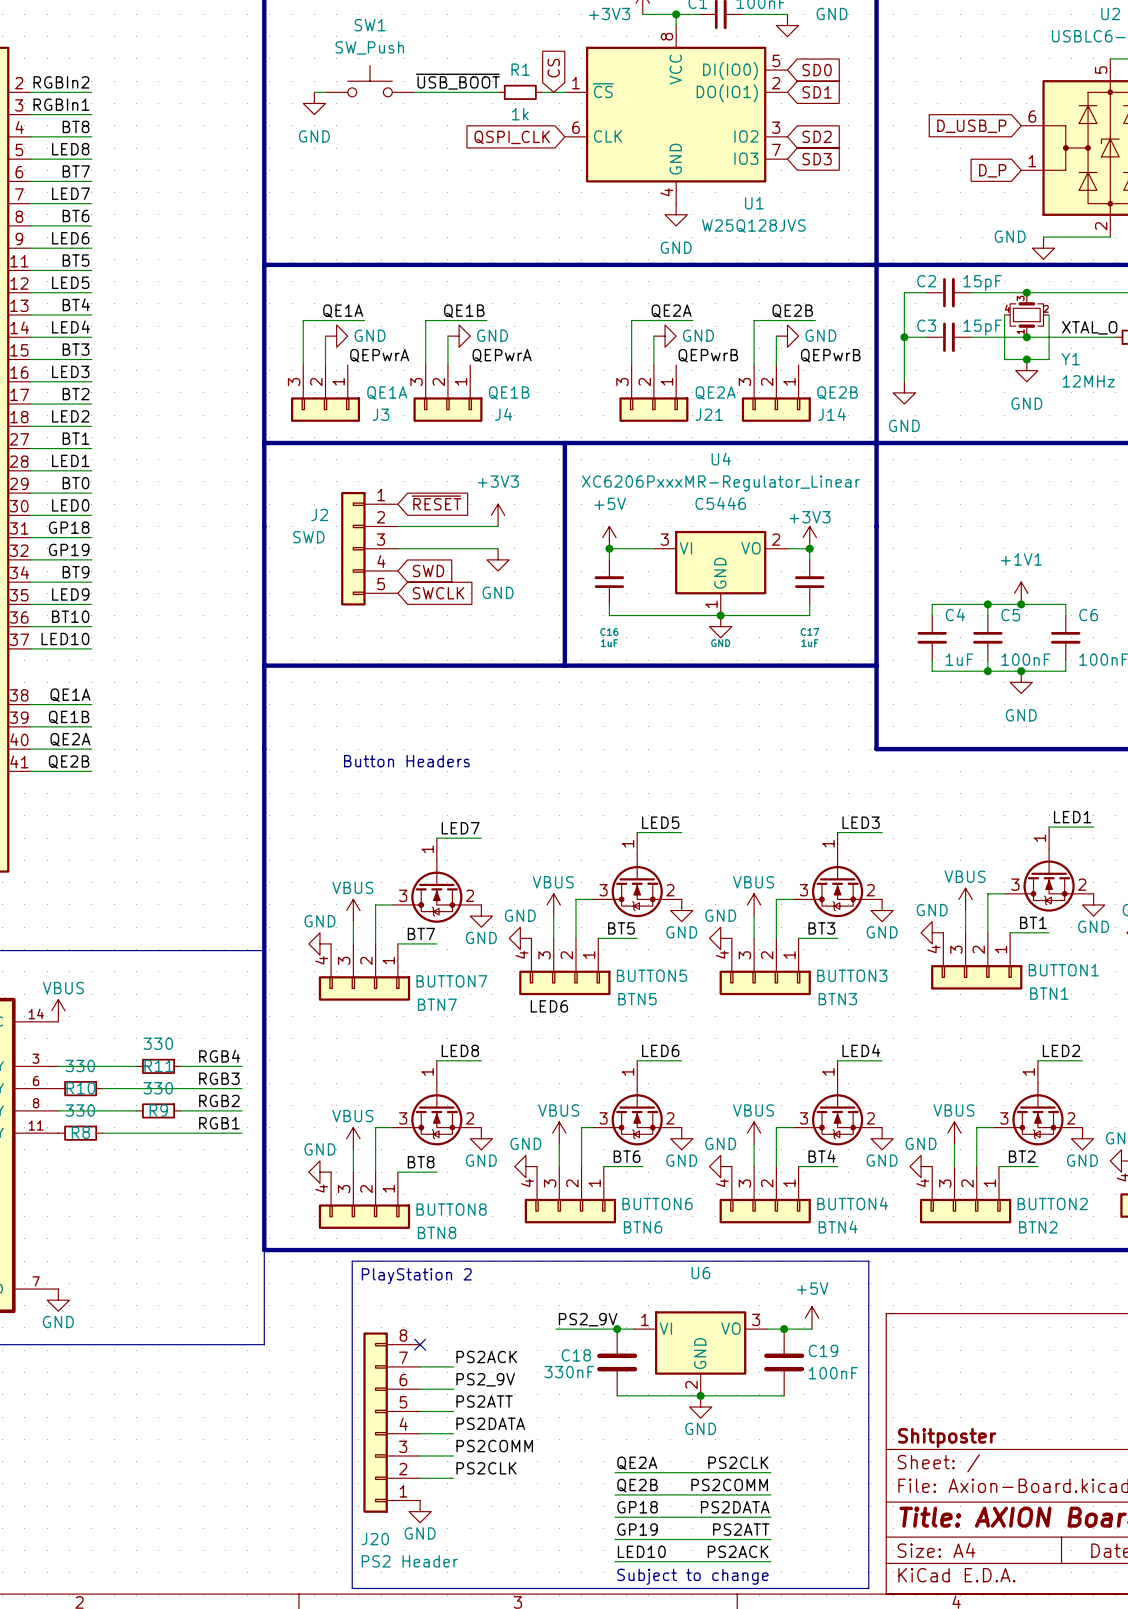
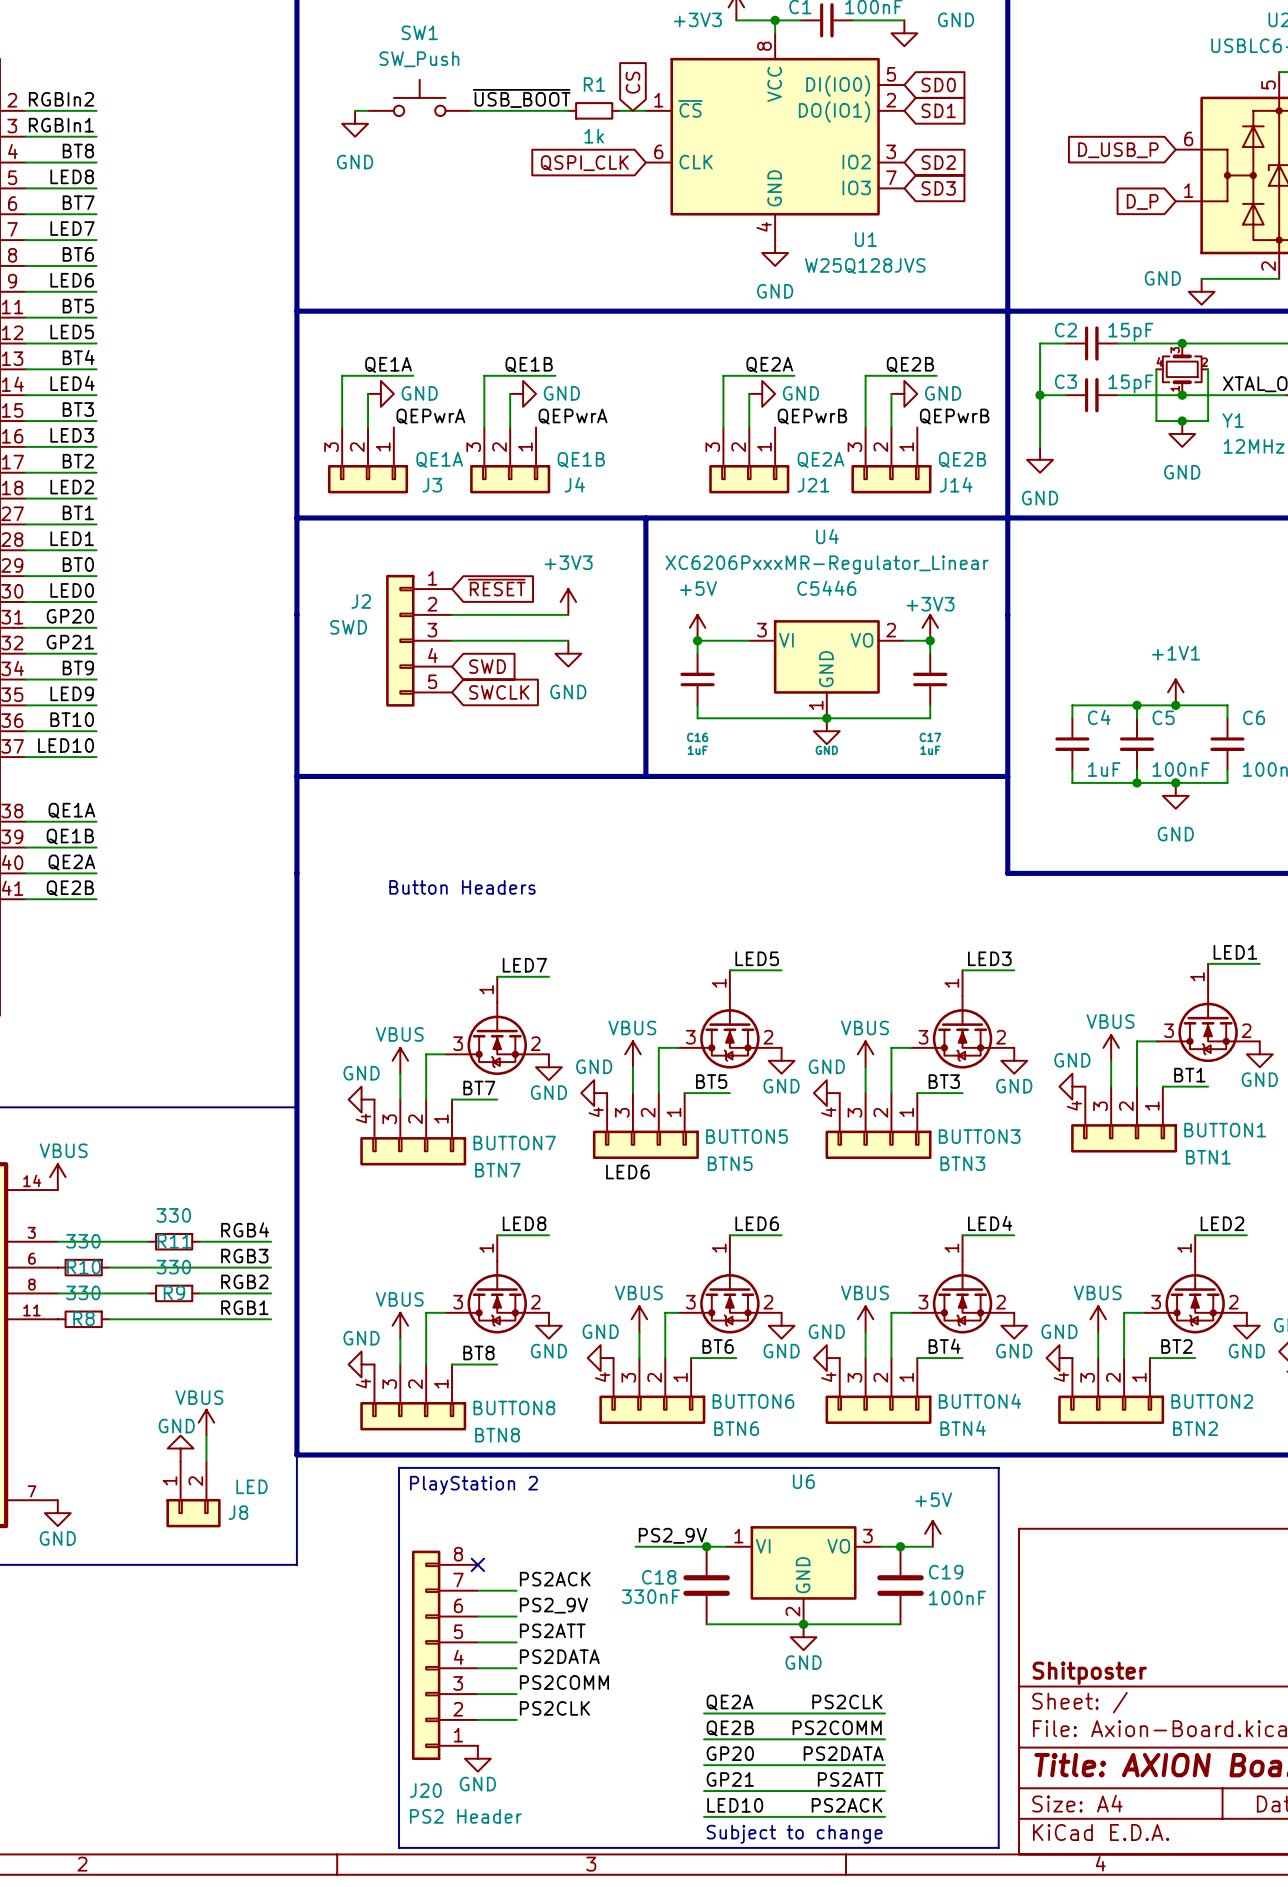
label: GP18 (69, 527) -> GP20 (70, 616)
label: GP19 (69, 549) -> GP21 (70, 642)
power symbol: none -> VBUS (206, 1422)
wire: none -> (206, 1435) (206, 1461)
power symbol: none -> GND (180, 1448)
J8: none -> LED (193, 1494)
label: GP18 (637, 1507) -> GP20 (730, 1753)
label: GP19 (637, 1529) -> GP21 (730, 1779)

